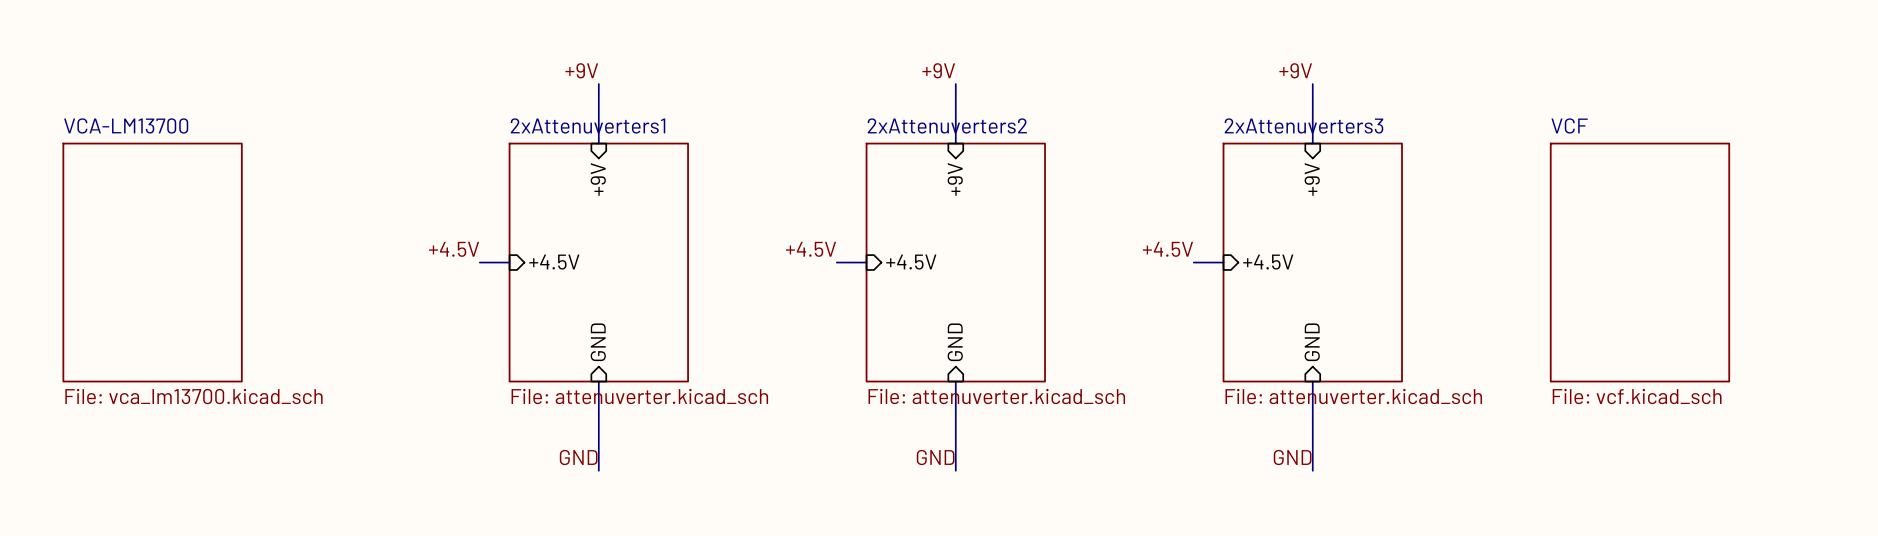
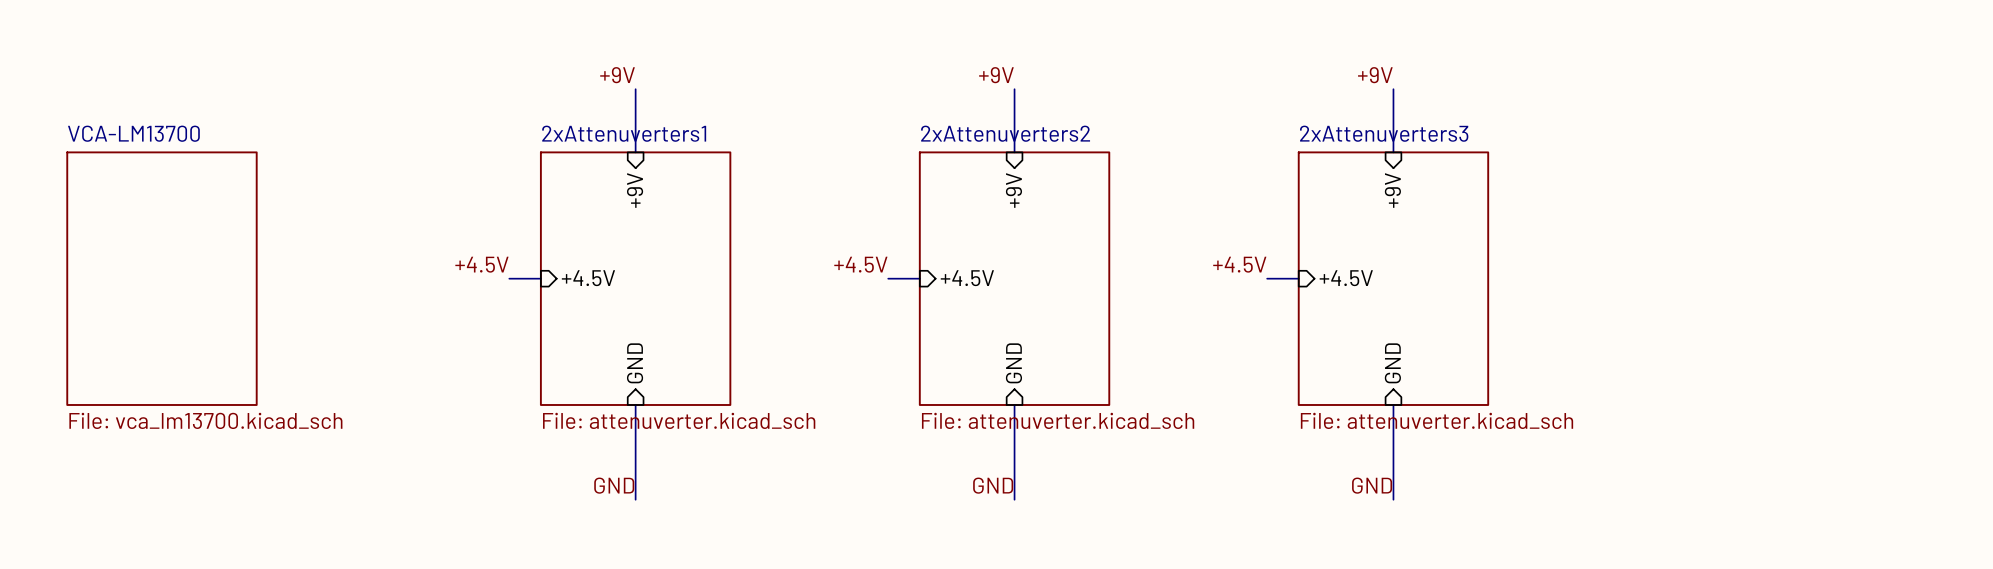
sheet VCF: File: vcf.kicad_sch (1639, 262) -> none

